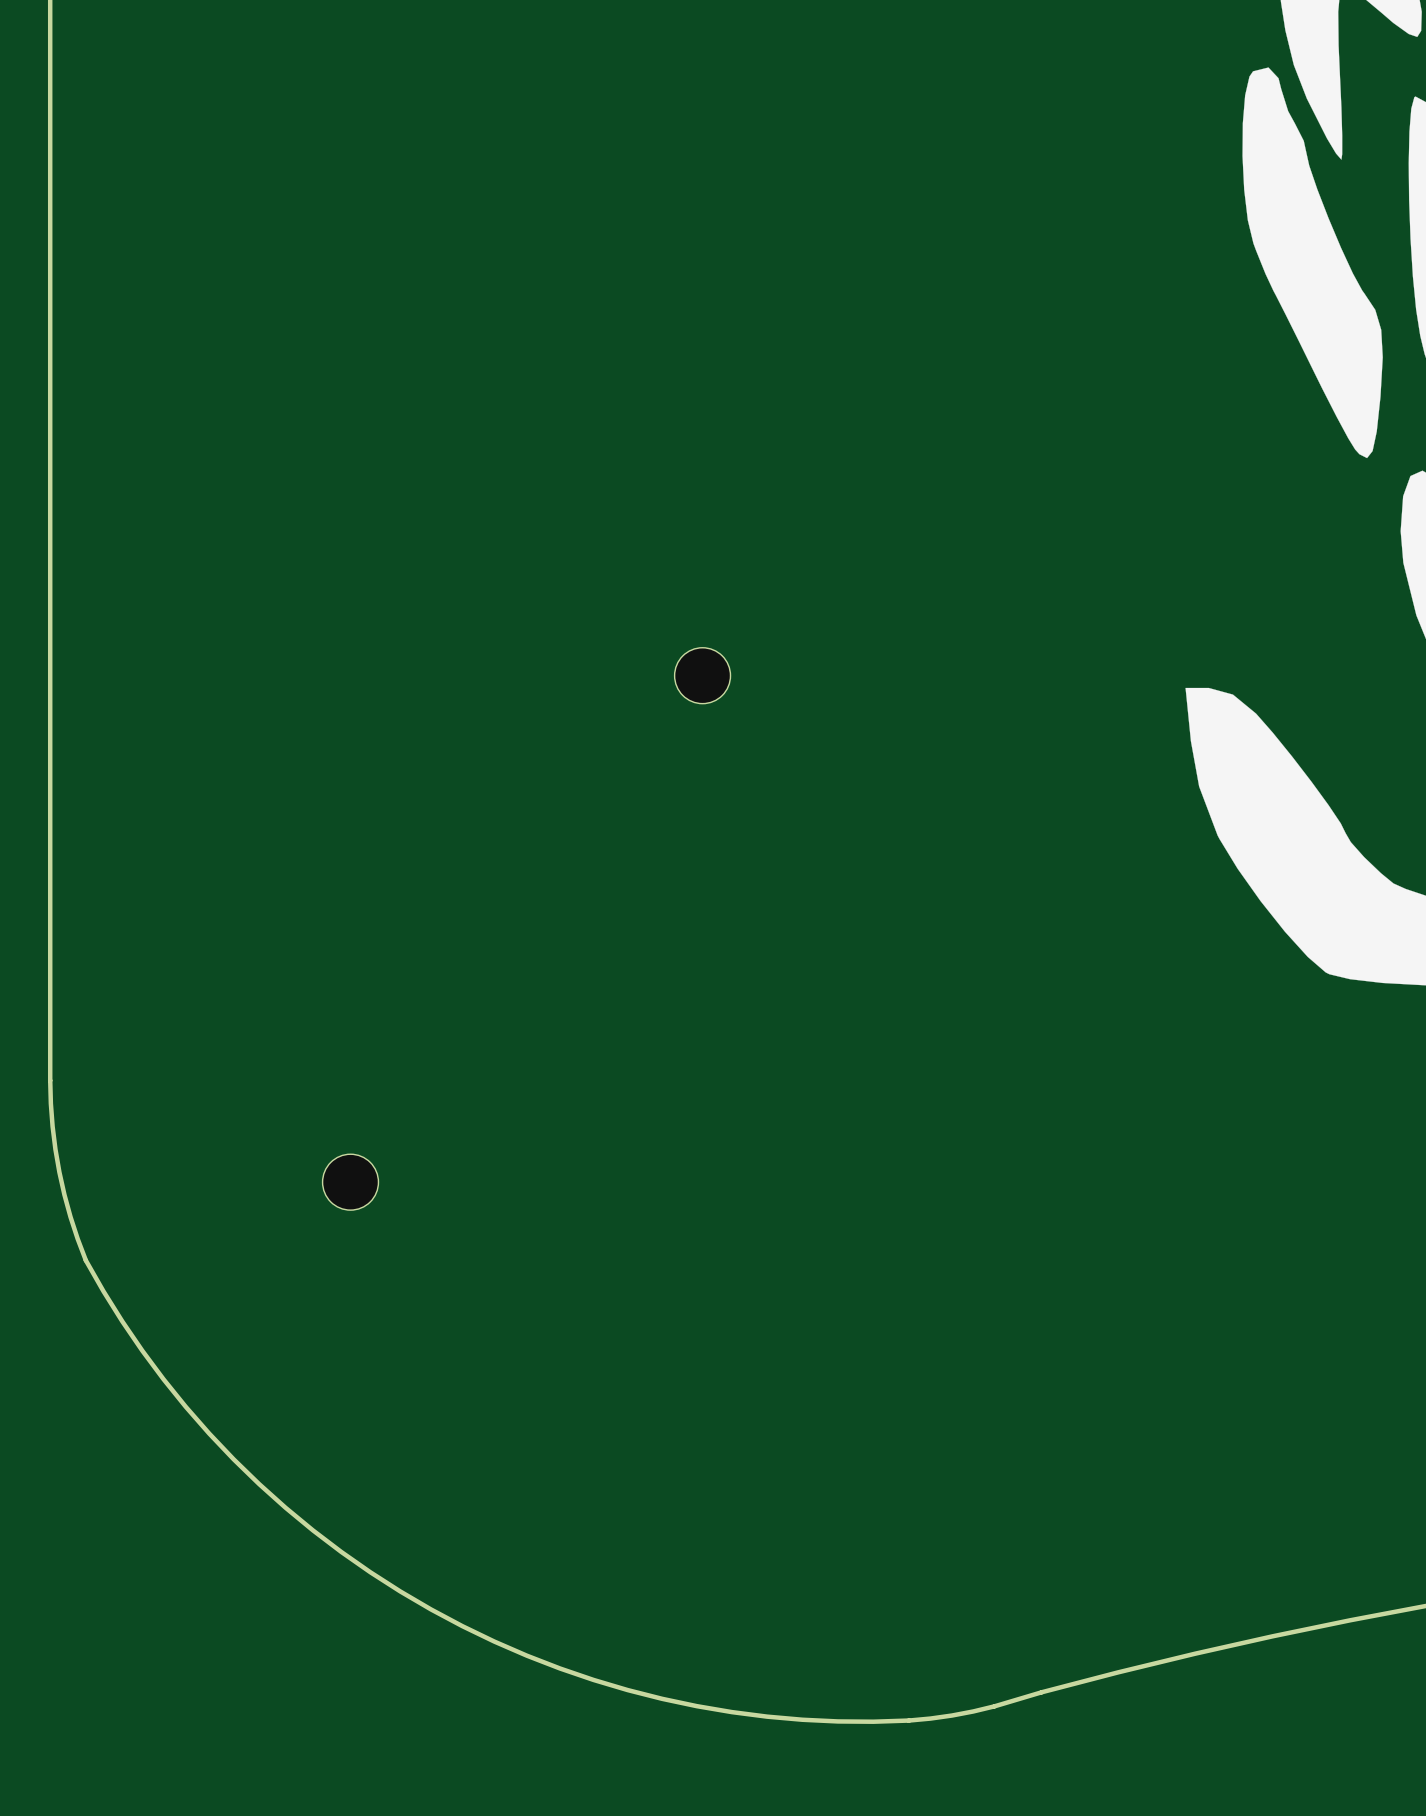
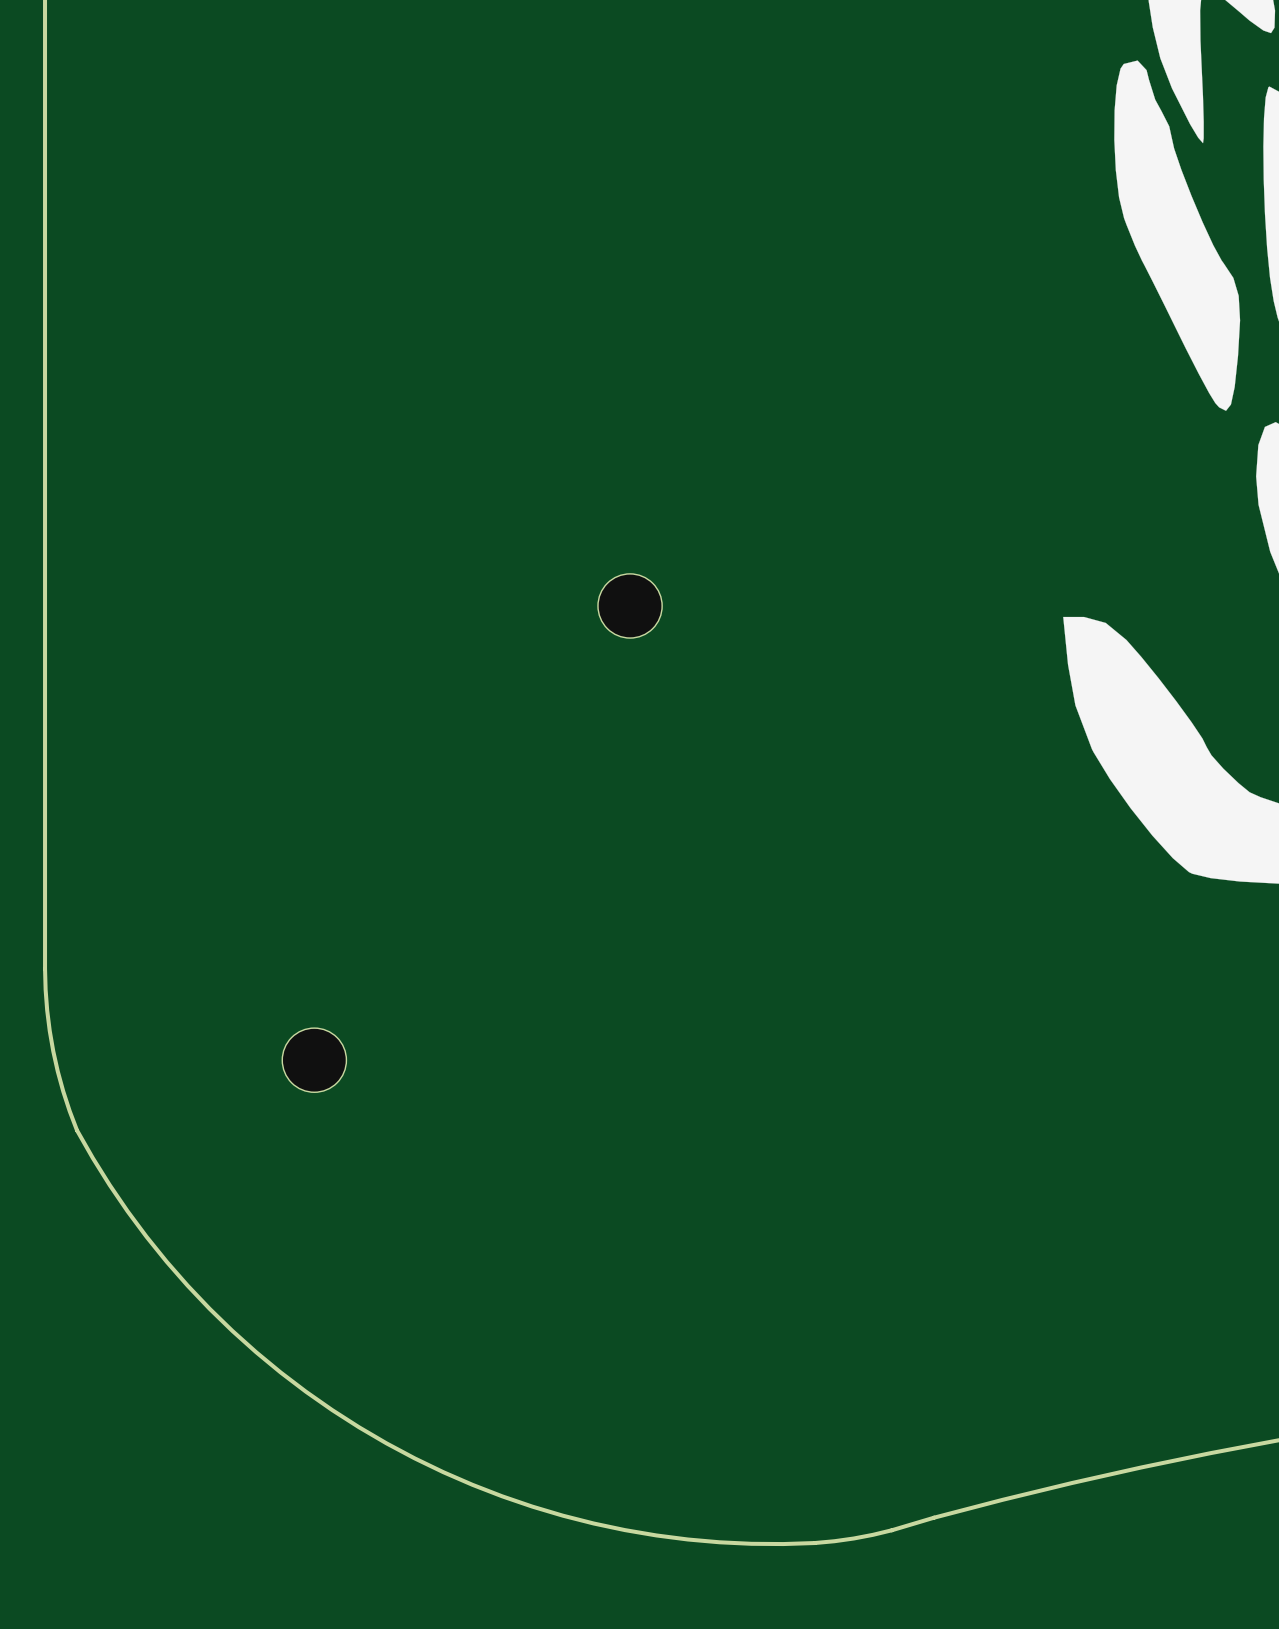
part footprint: [674, 647, 731, 704] -> [597, 573, 663, 639]
part footprint: [322, 1154, 379, 1211] -> [282, 1028, 347, 1093]

